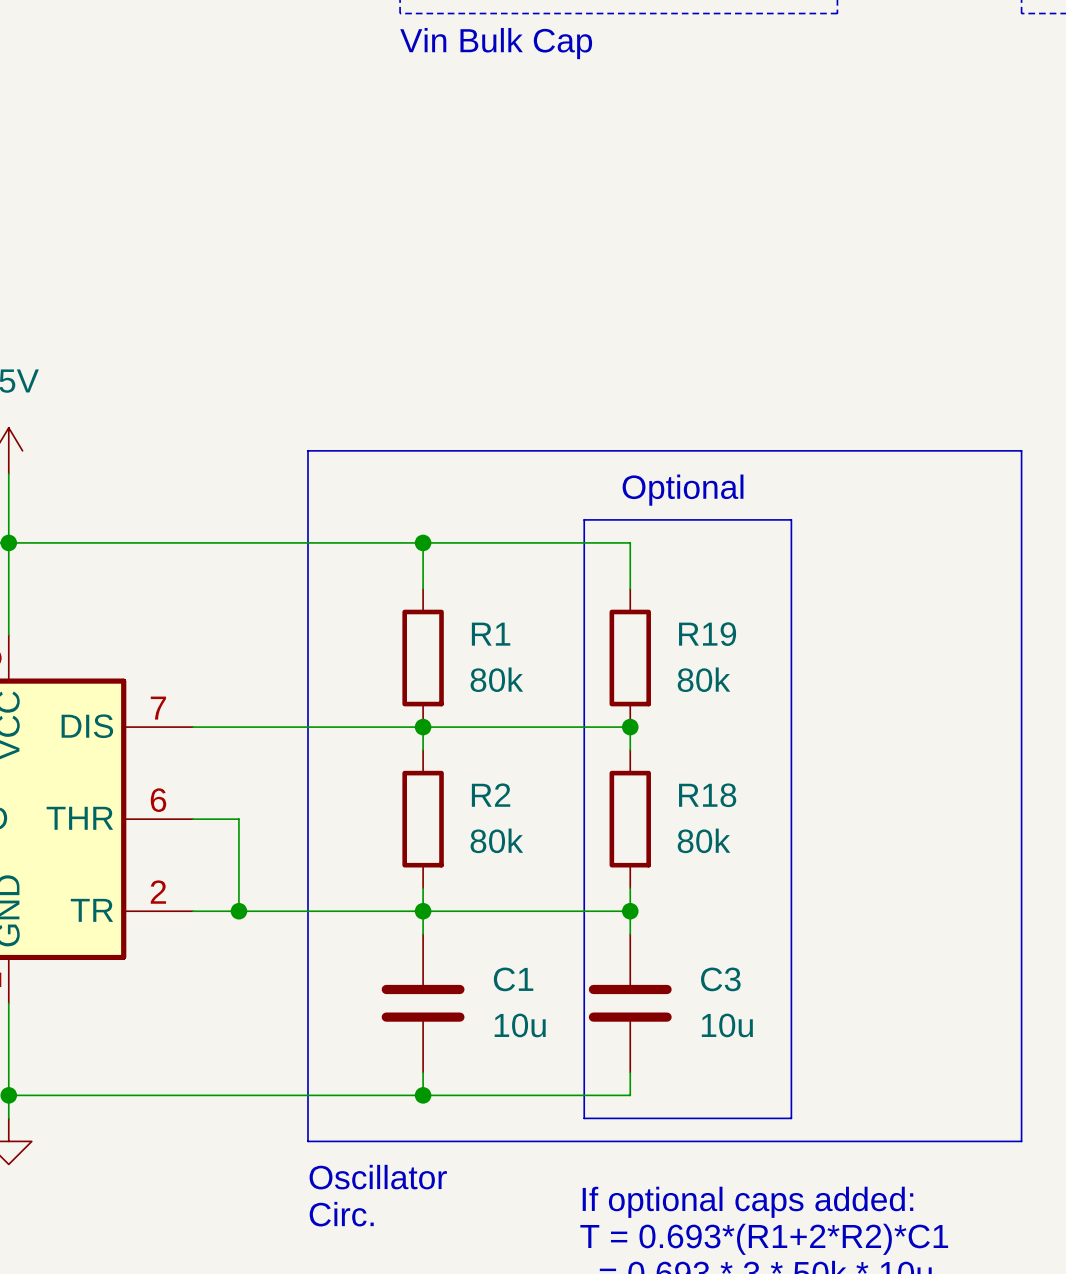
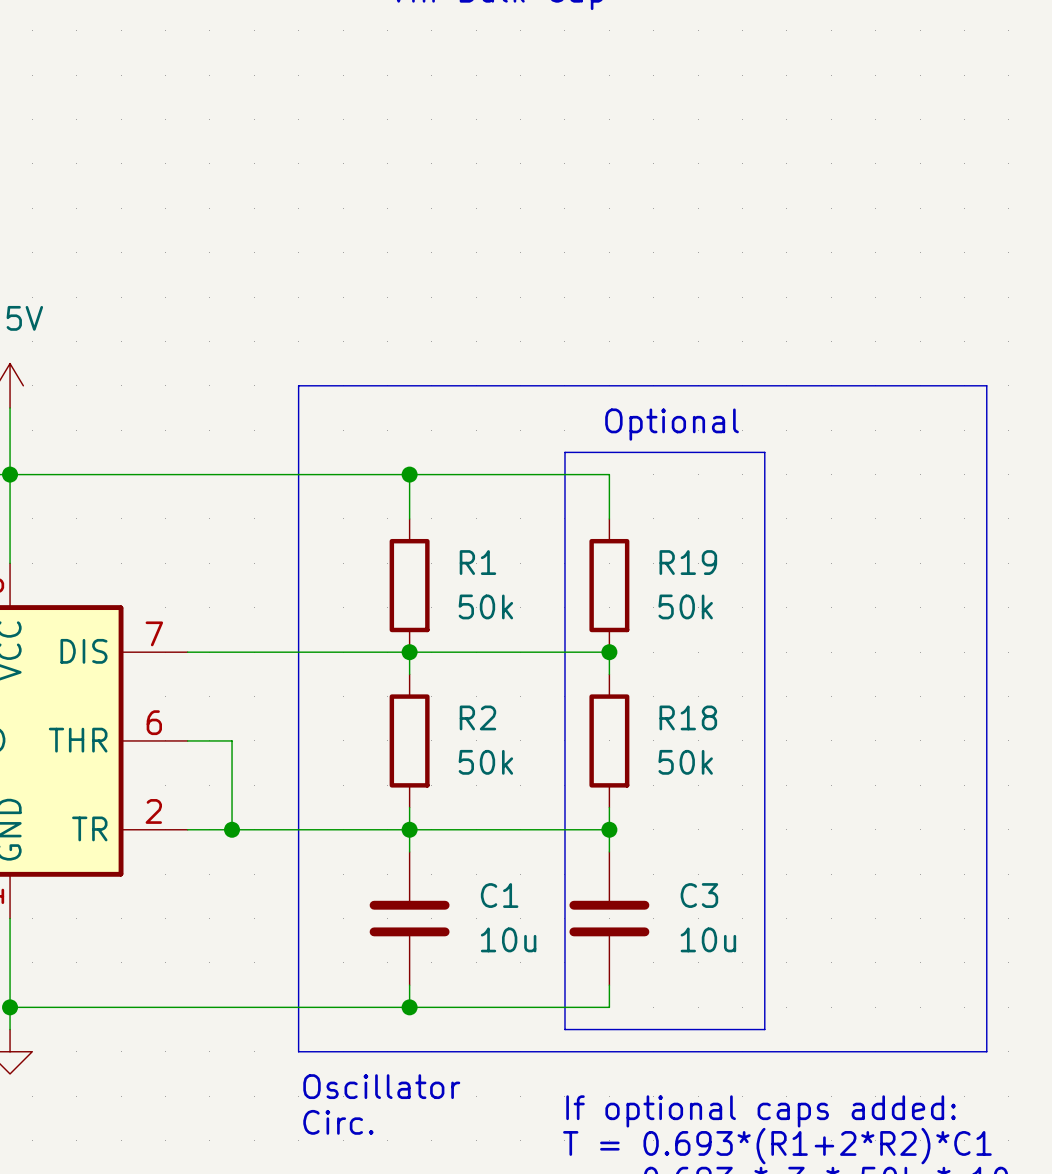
R1 value: 80k (496, 679) -> 50k (485, 606)
R19 value: 80k (704, 679) -> 50k (685, 606)
R2 value: 80k (496, 840) -> 50k (485, 762)
R18 value: 80k (704, 840) -> 50k (685, 762)

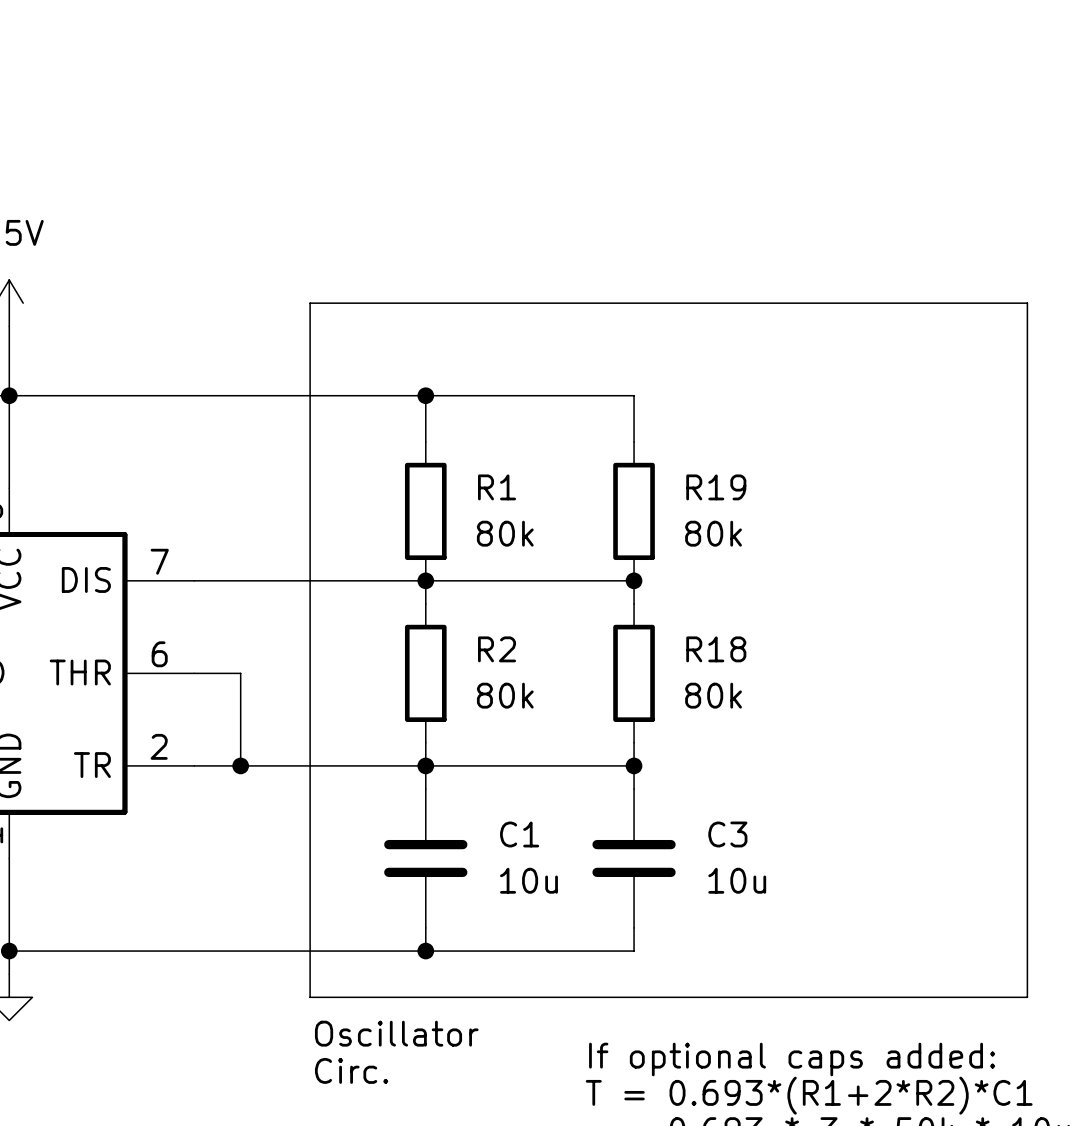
text: Optional (672, 424) -> none
line: (564, 452) (764, 452) (764, 1029) (564, 1029) (564, 452) -> none
R1 value: 50k (485, 606) -> 80k (505, 533)
R19 value: 50k (685, 606) -> 80k (713, 533)
R2 value: 50k (485, 762) -> 80k (505, 695)
R18 value: 50k (685, 762) -> 80k (713, 695)

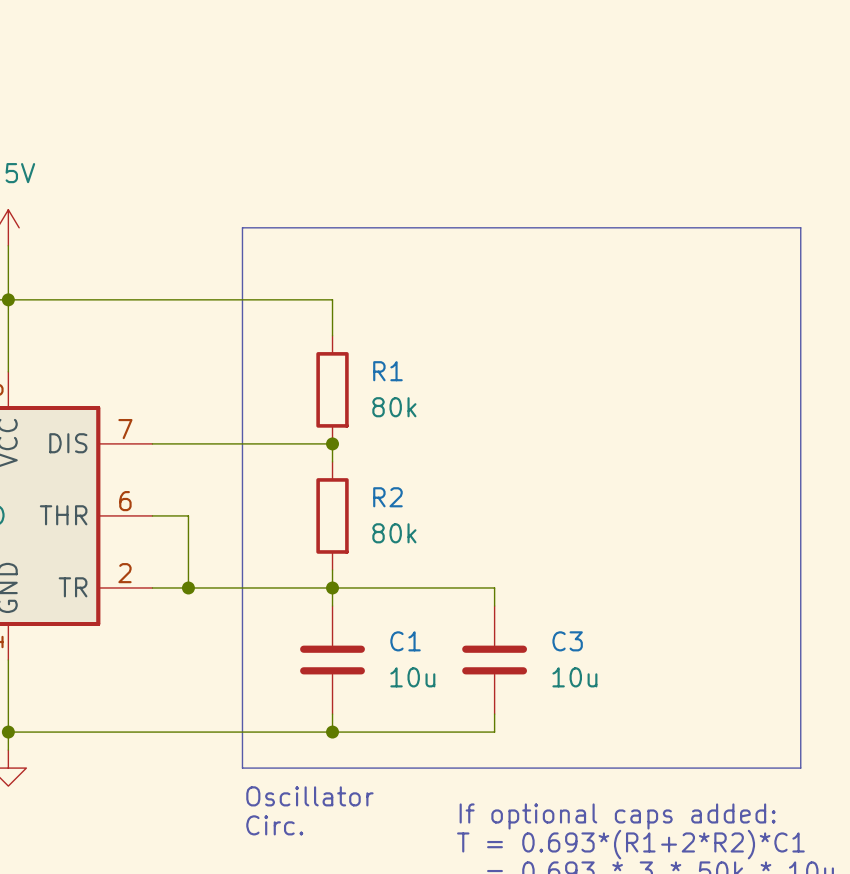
wire: (425, 395) (634, 395) (634, 441) -> none
junction: (425, 395) -> none
R19: 80k (634, 511) -> none
wire: (425, 580) (634, 580) (634, 603) -> none
junction: (634, 580) -> none
R18: 80k (634, 673) -> none
wire: (634, 742) (634, 765) -> none
junction: (634, 765) -> none

